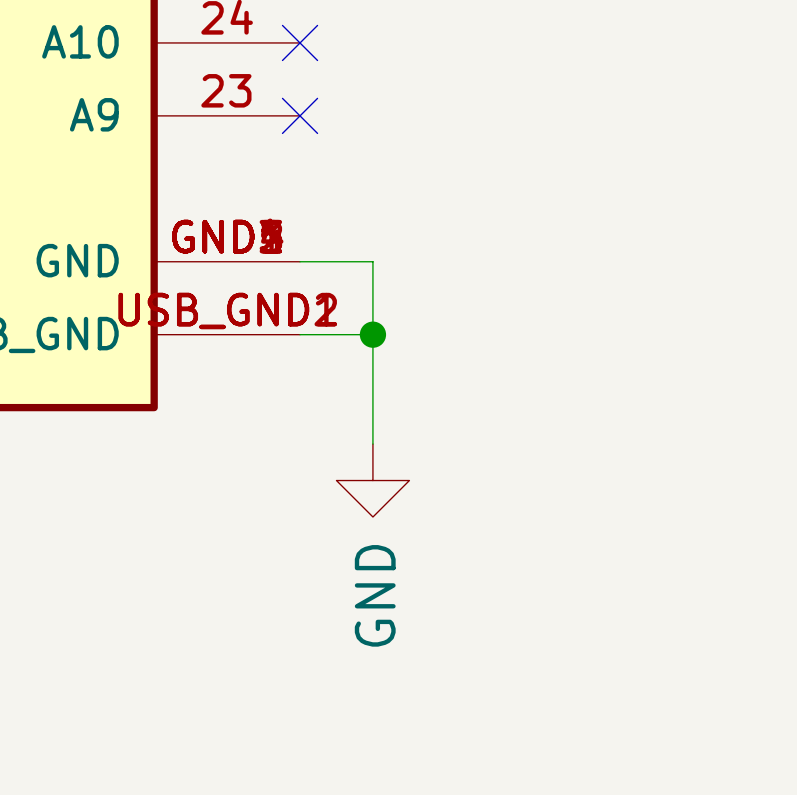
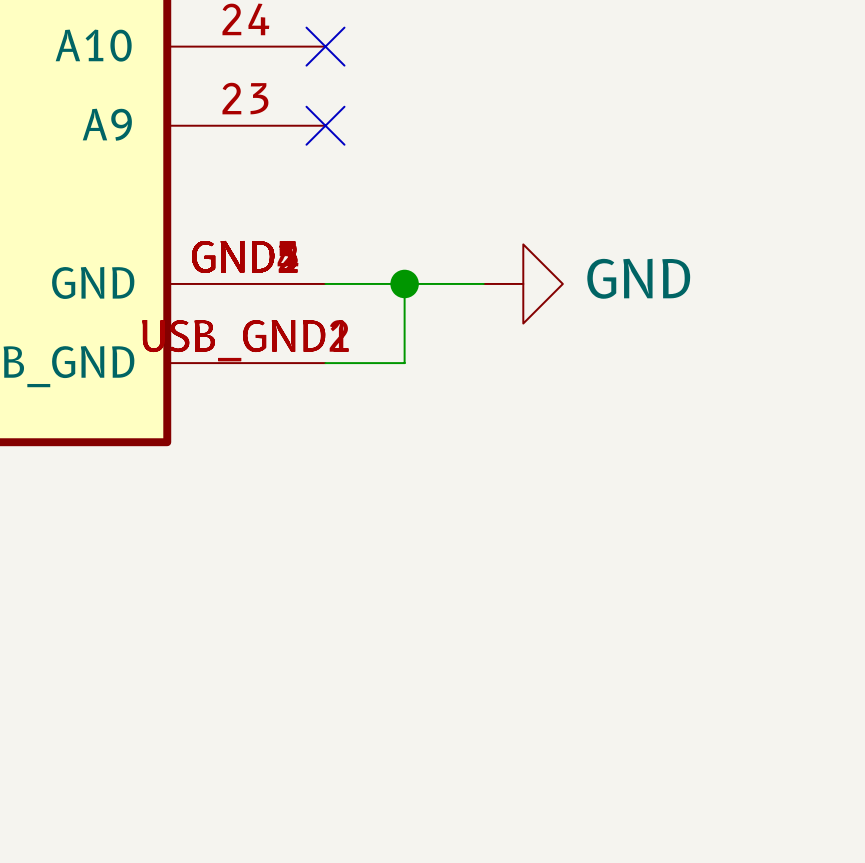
wire: none -> (404, 283) (483, 283)
wire: (372, 334) (372, 444) -> none
junction position: (372, 334) -> (404, 283)
power symbol rotation: 0° (372, 480) -> 90° counterclockwise (523, 283)
power symbol position: GND (372, 480) -> GND (523, 283)

